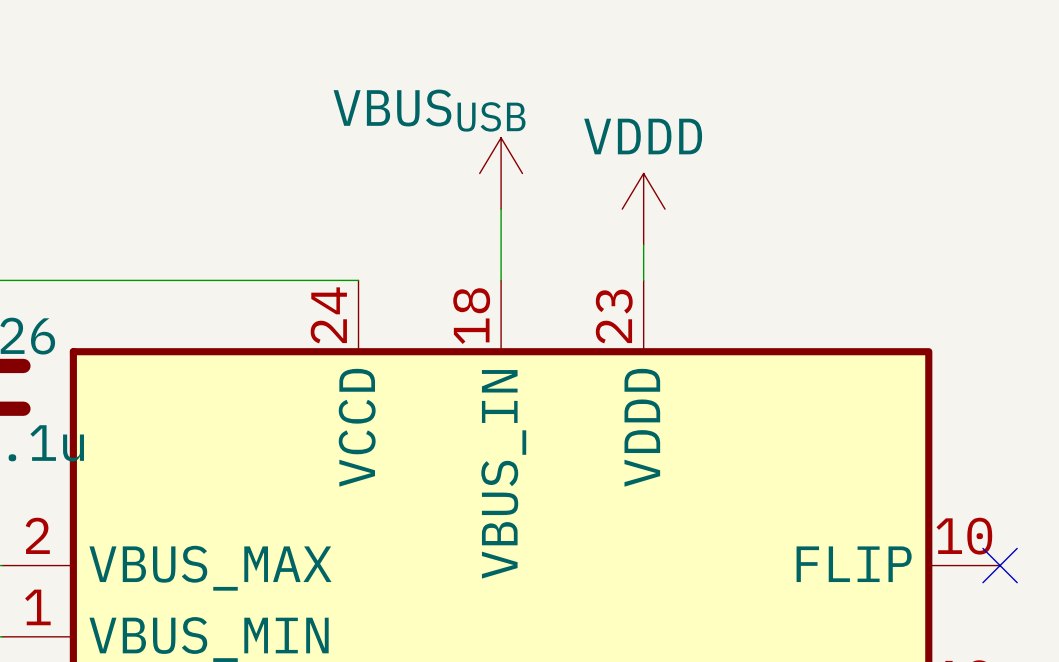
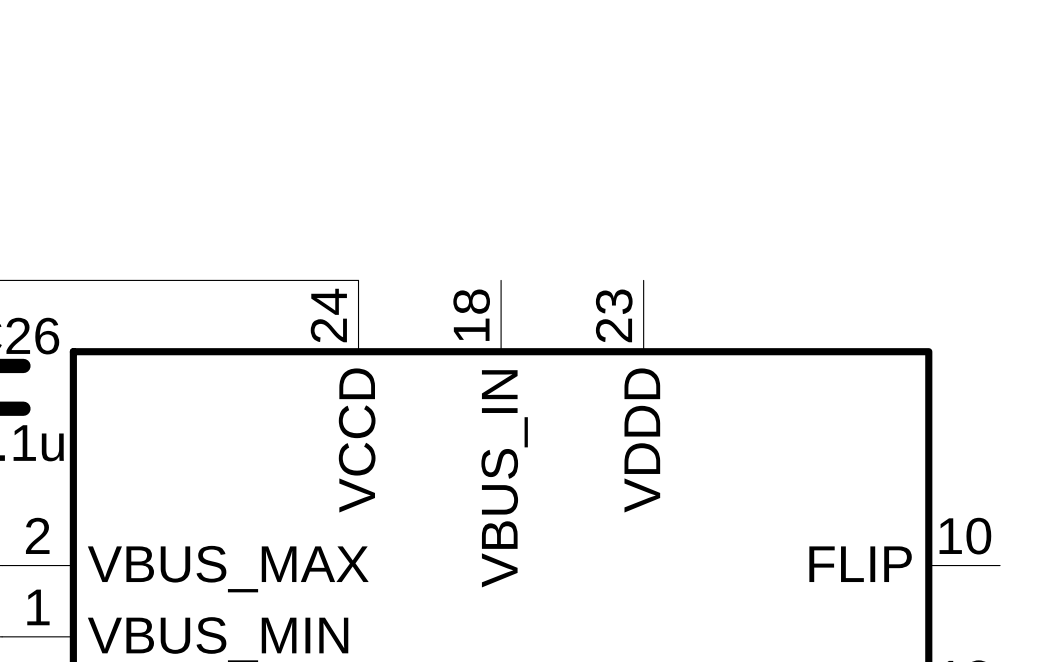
power symbol: VBUSUSB (501, 173) -> none
wire: (501, 209) (501, 280) -> none
power symbol: VDDD (643, 209) -> none
wire: (643, 244) (643, 280) -> none
no-connect mark: (1000, 565) -> none

